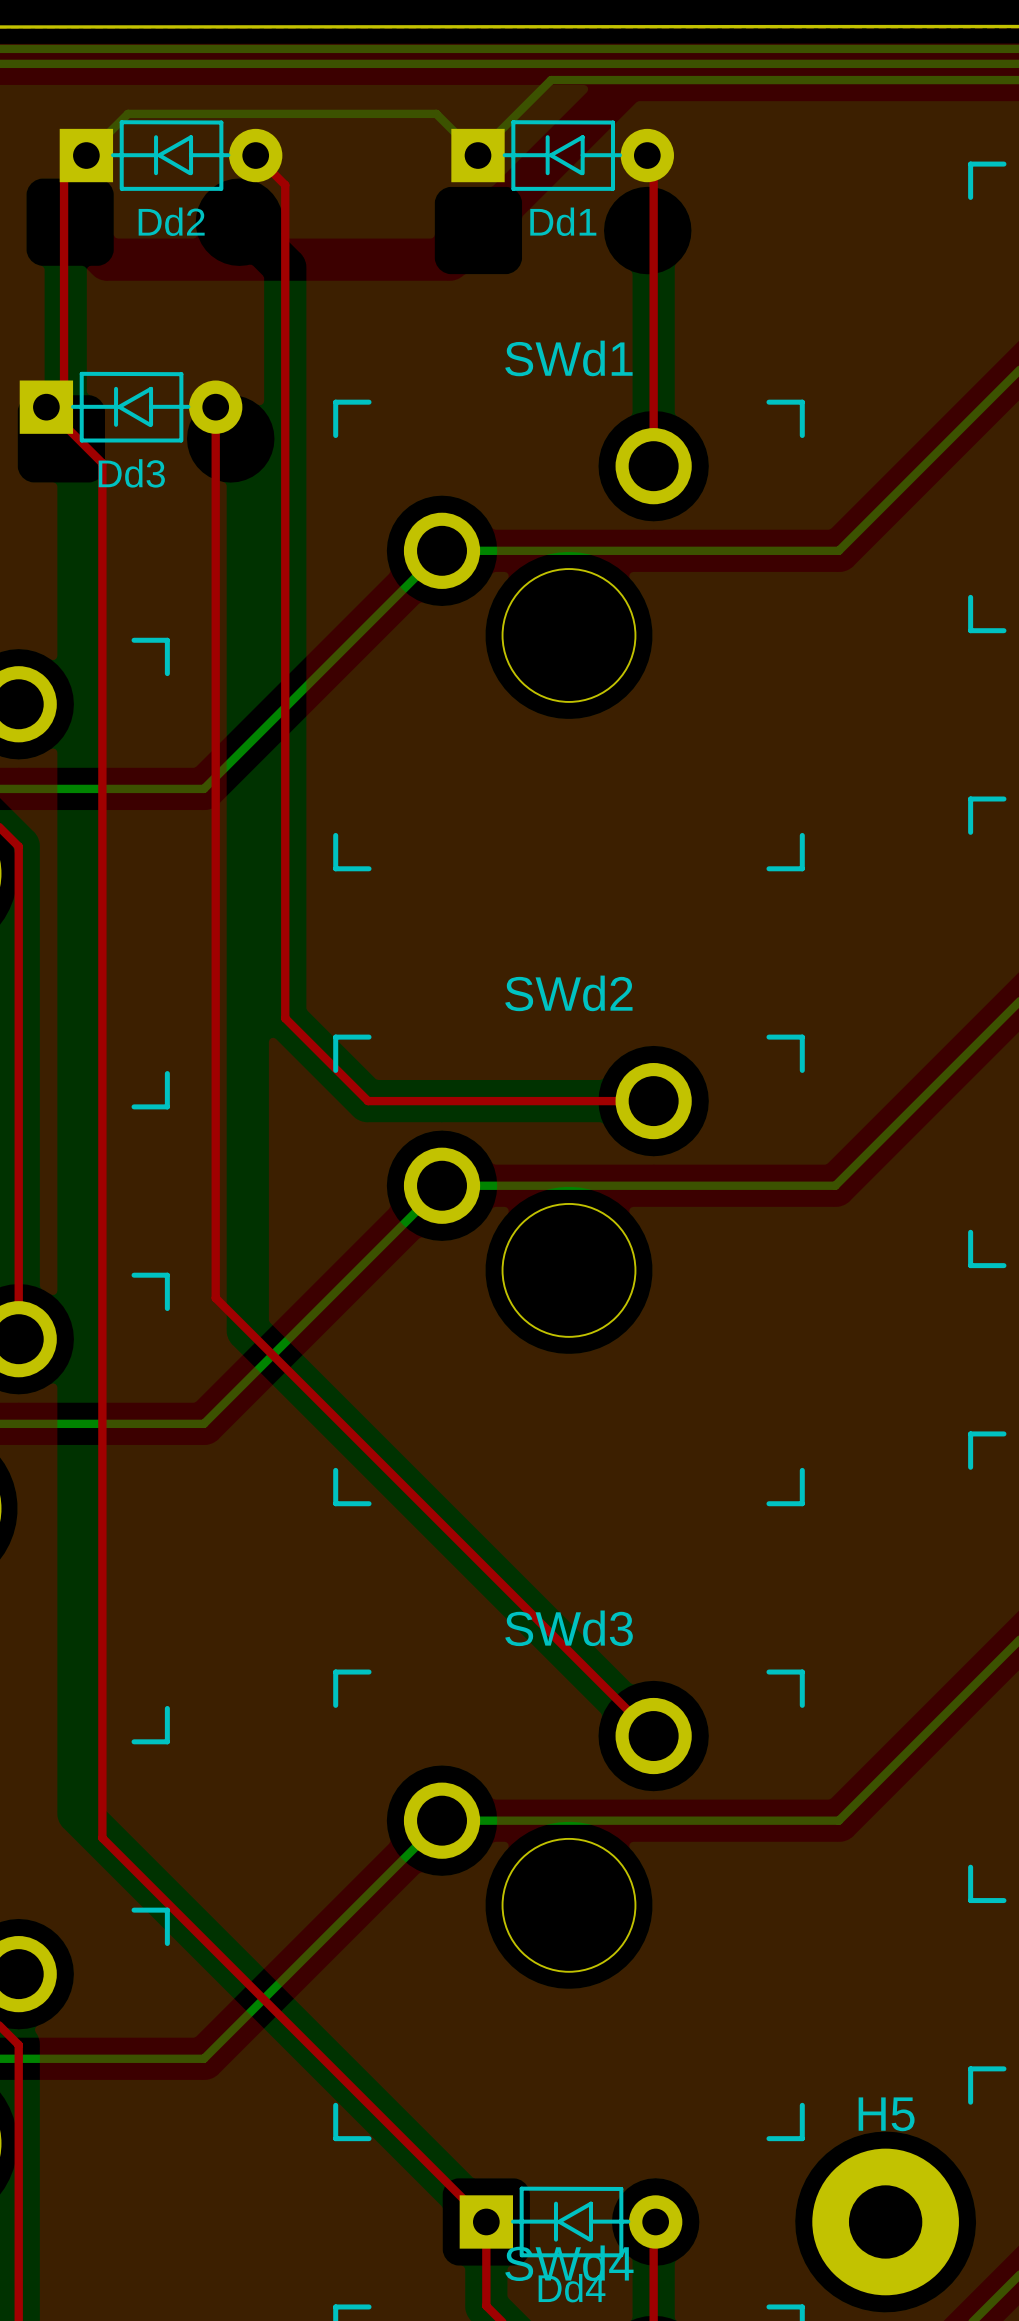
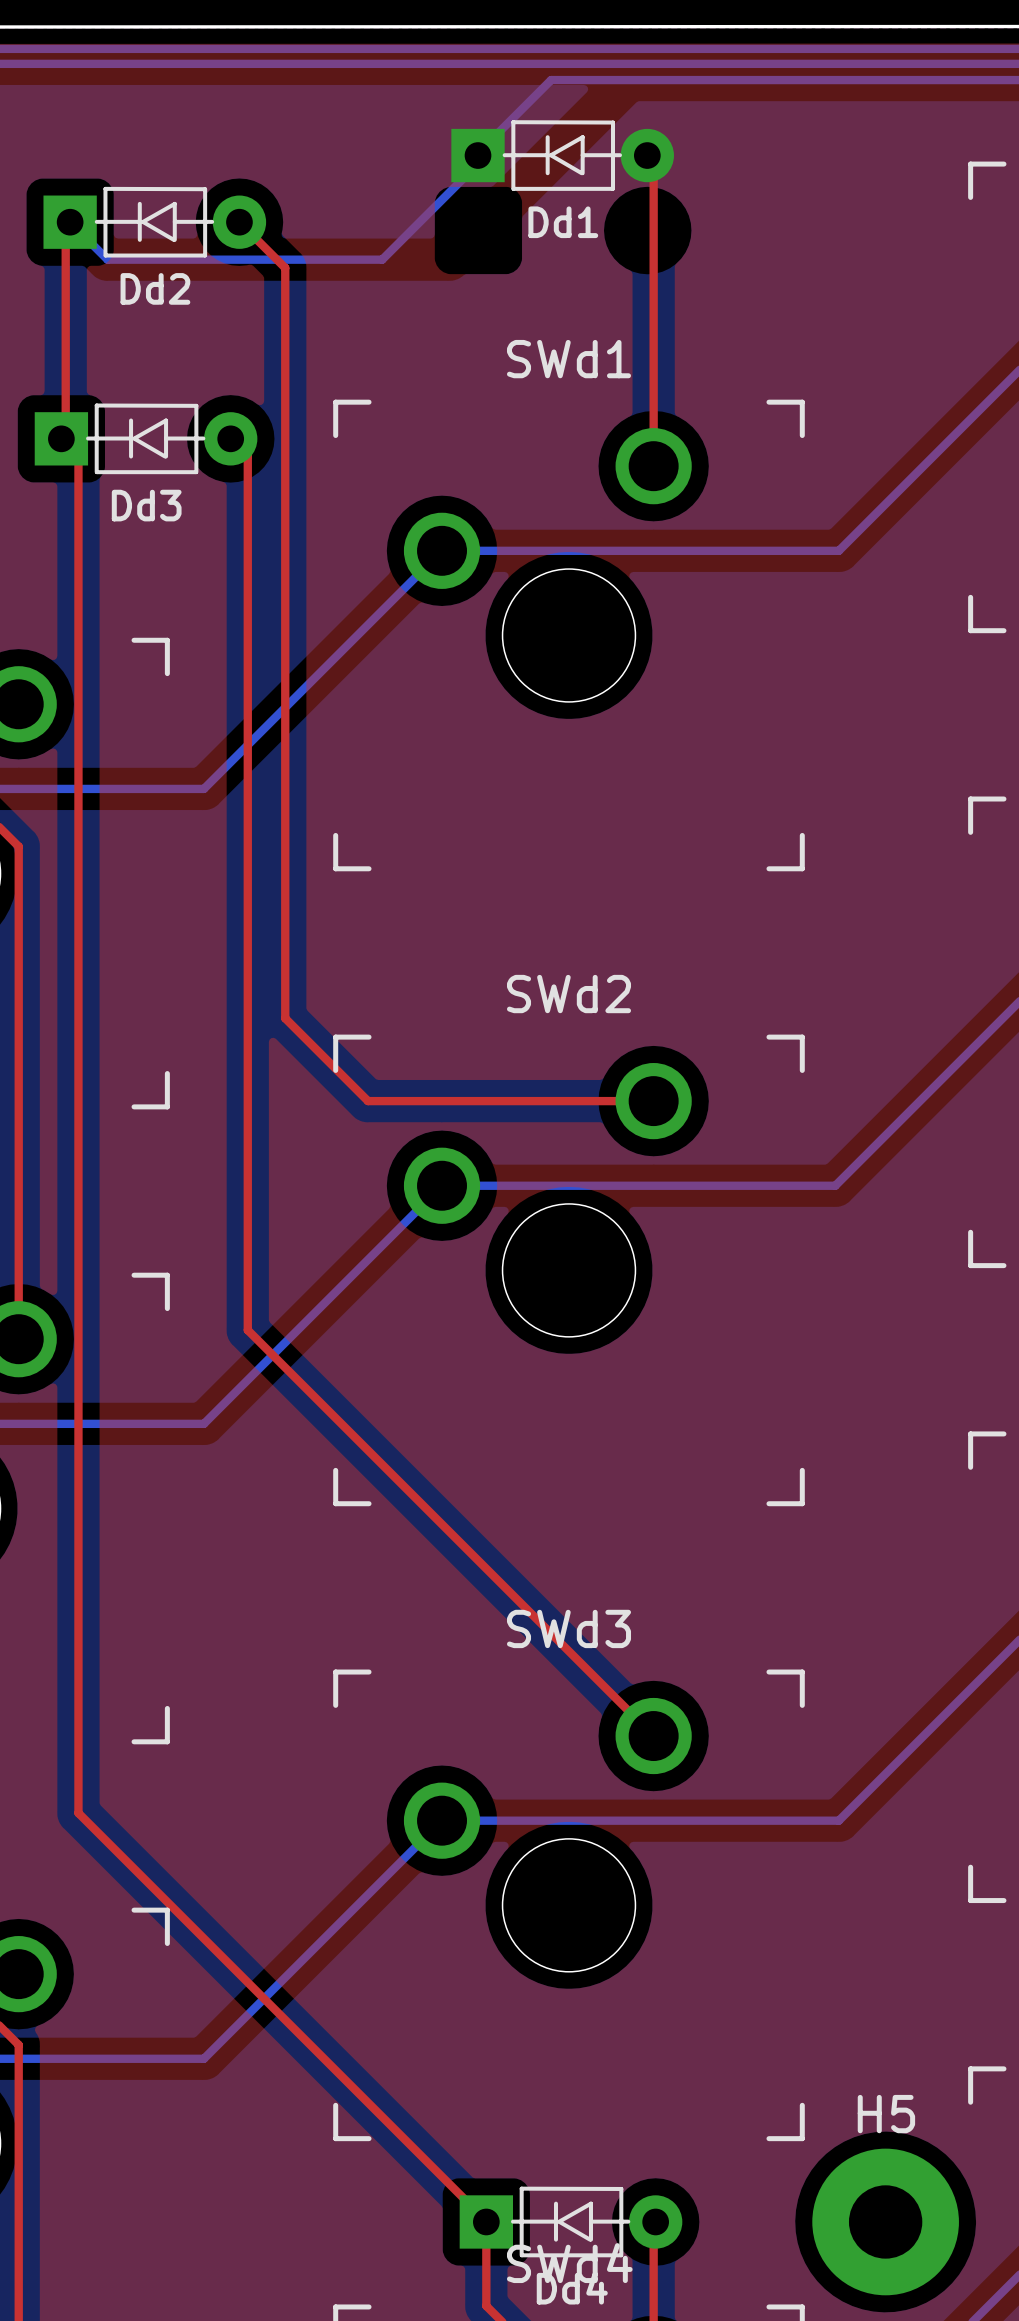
top track: (86, 155) (64, 177) (64, 389) (46, 407) (102, 463) (102, 1838) (486, 2221) -> (70, 222) (65, 226) (65, 434) (61, 438) (78, 455) (78, 1813) (486, 2221)
bottom track: (86, 155) (128, 113) (436, 113) (478, 155) -> (70, 222) (107, 259) (382, 259) (478, 163) (478, 155)
Dd2 position: (171, 155) -> (154, 222)
top track: (255, 155) (285, 185) (285, 268) -> (239, 222) (285, 268)
Dd3 position: (131, 407) -> (146, 438)
top track: (215, 407) (215, 1298) (247, 1330) -> (230, 438) (247, 455) (247, 1330)

